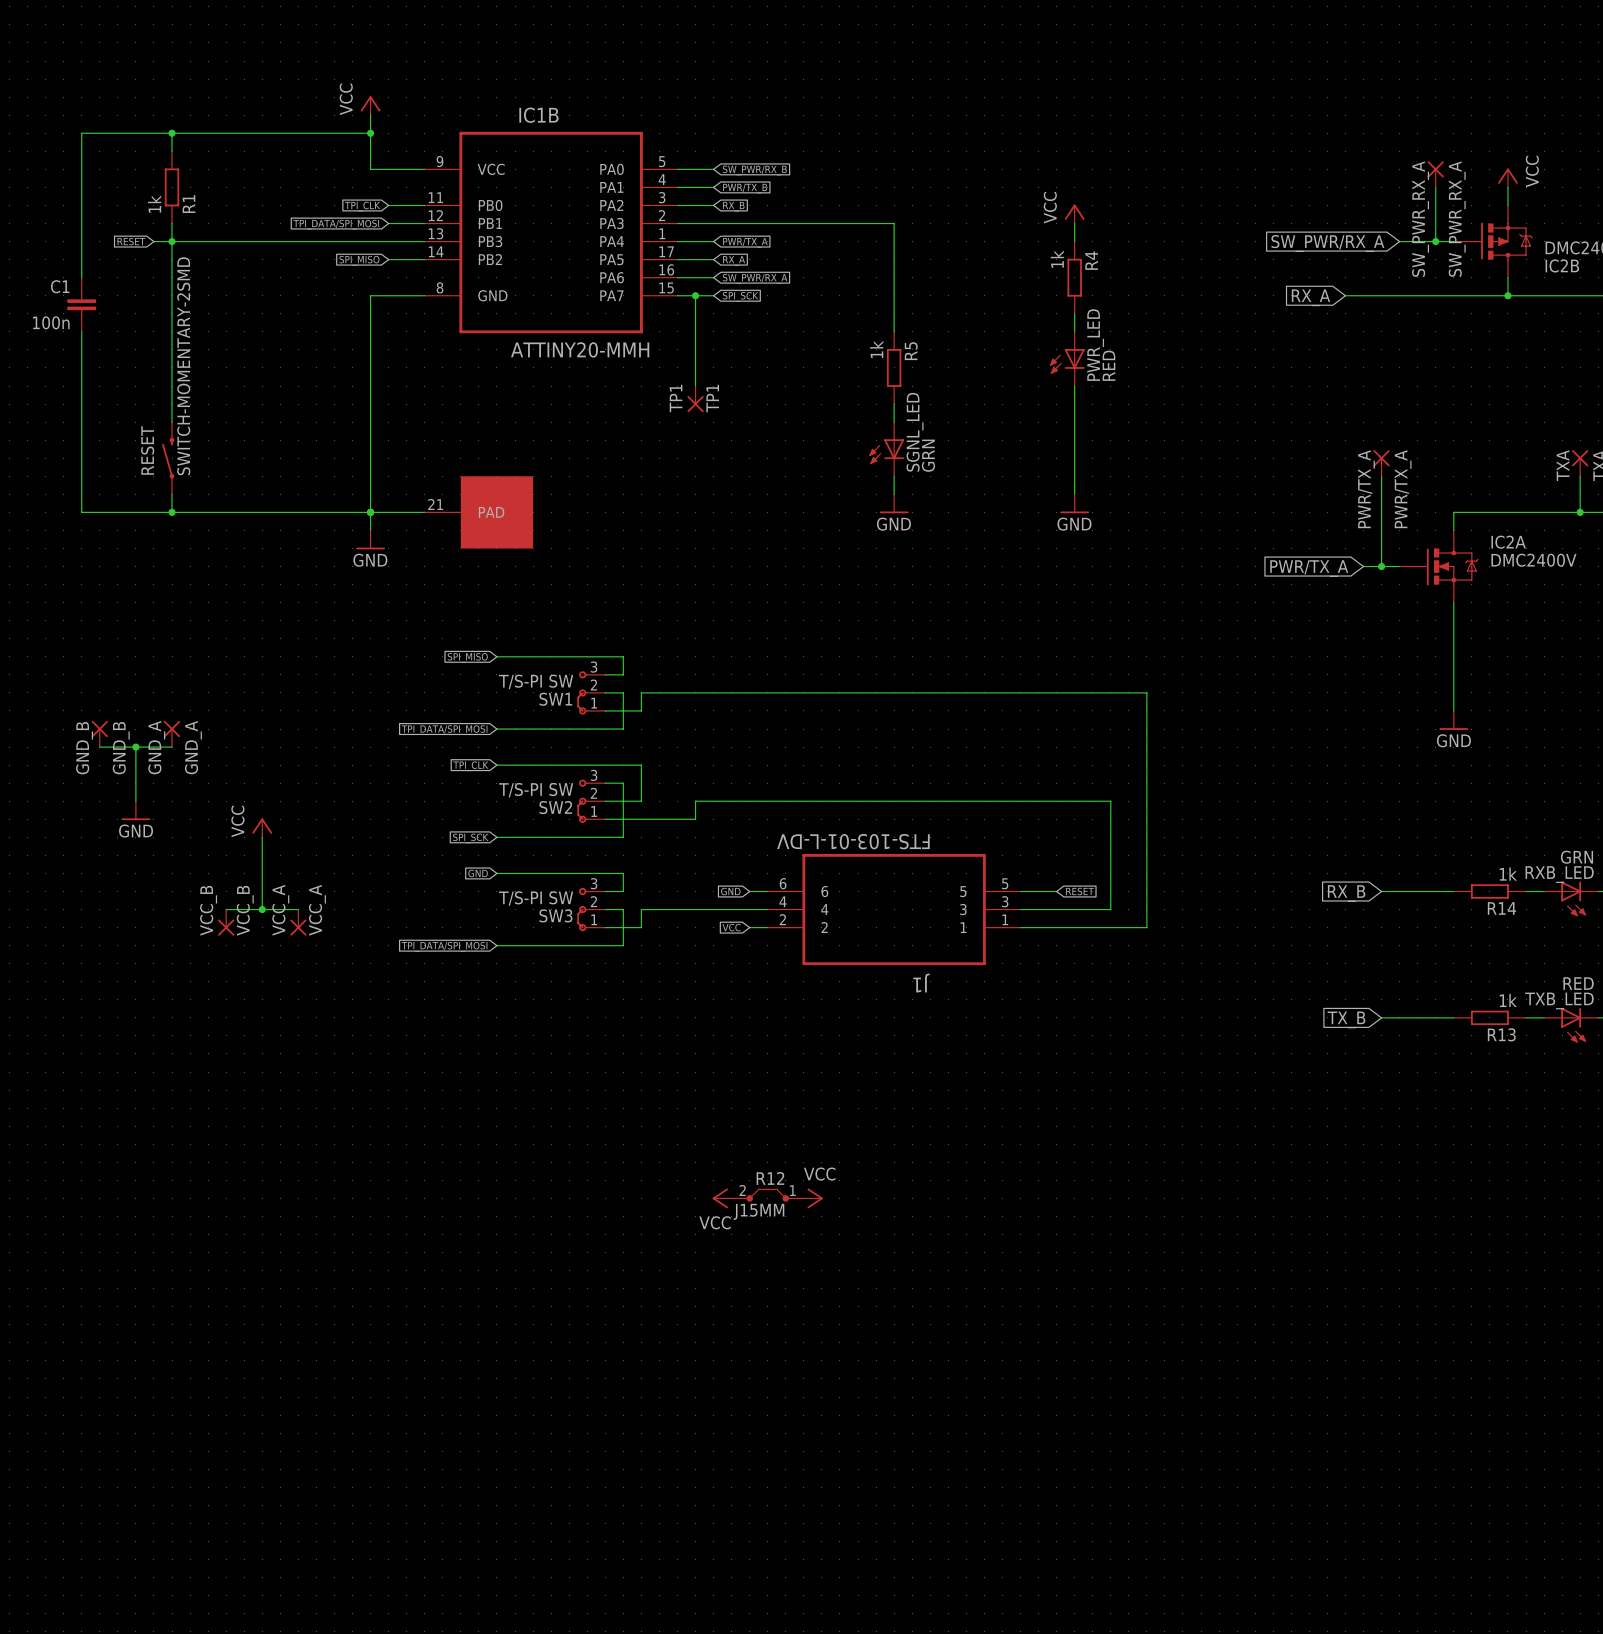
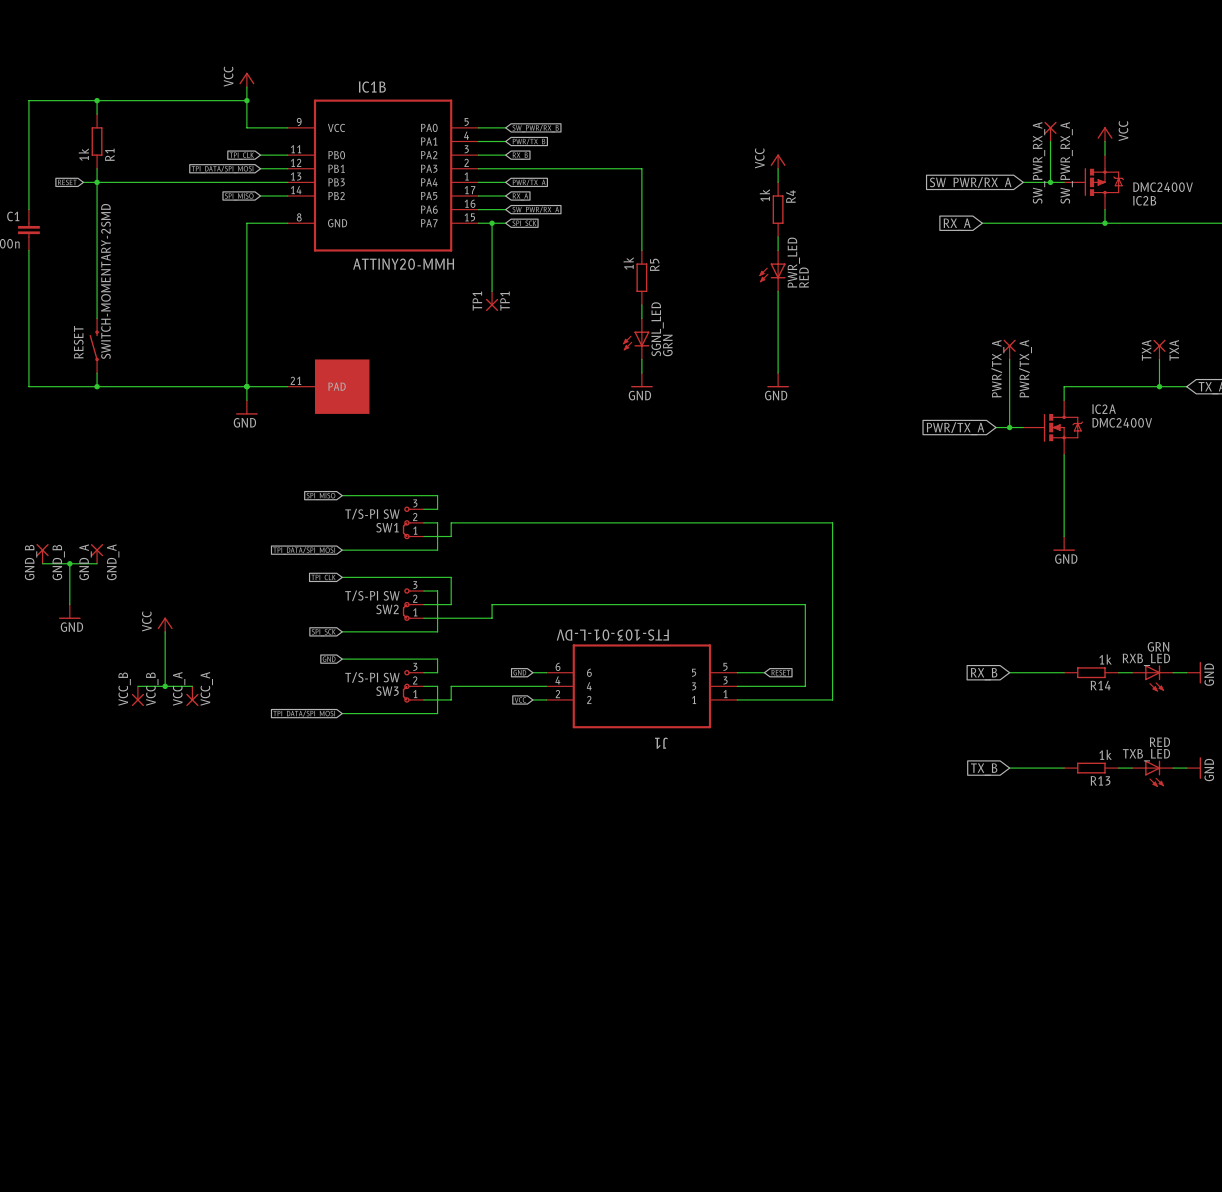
R12: J15MM (767, 1195) -> none
power symbol: VCC (722, 1198) -> none
power symbol: VCC (813, 1198) -> none

